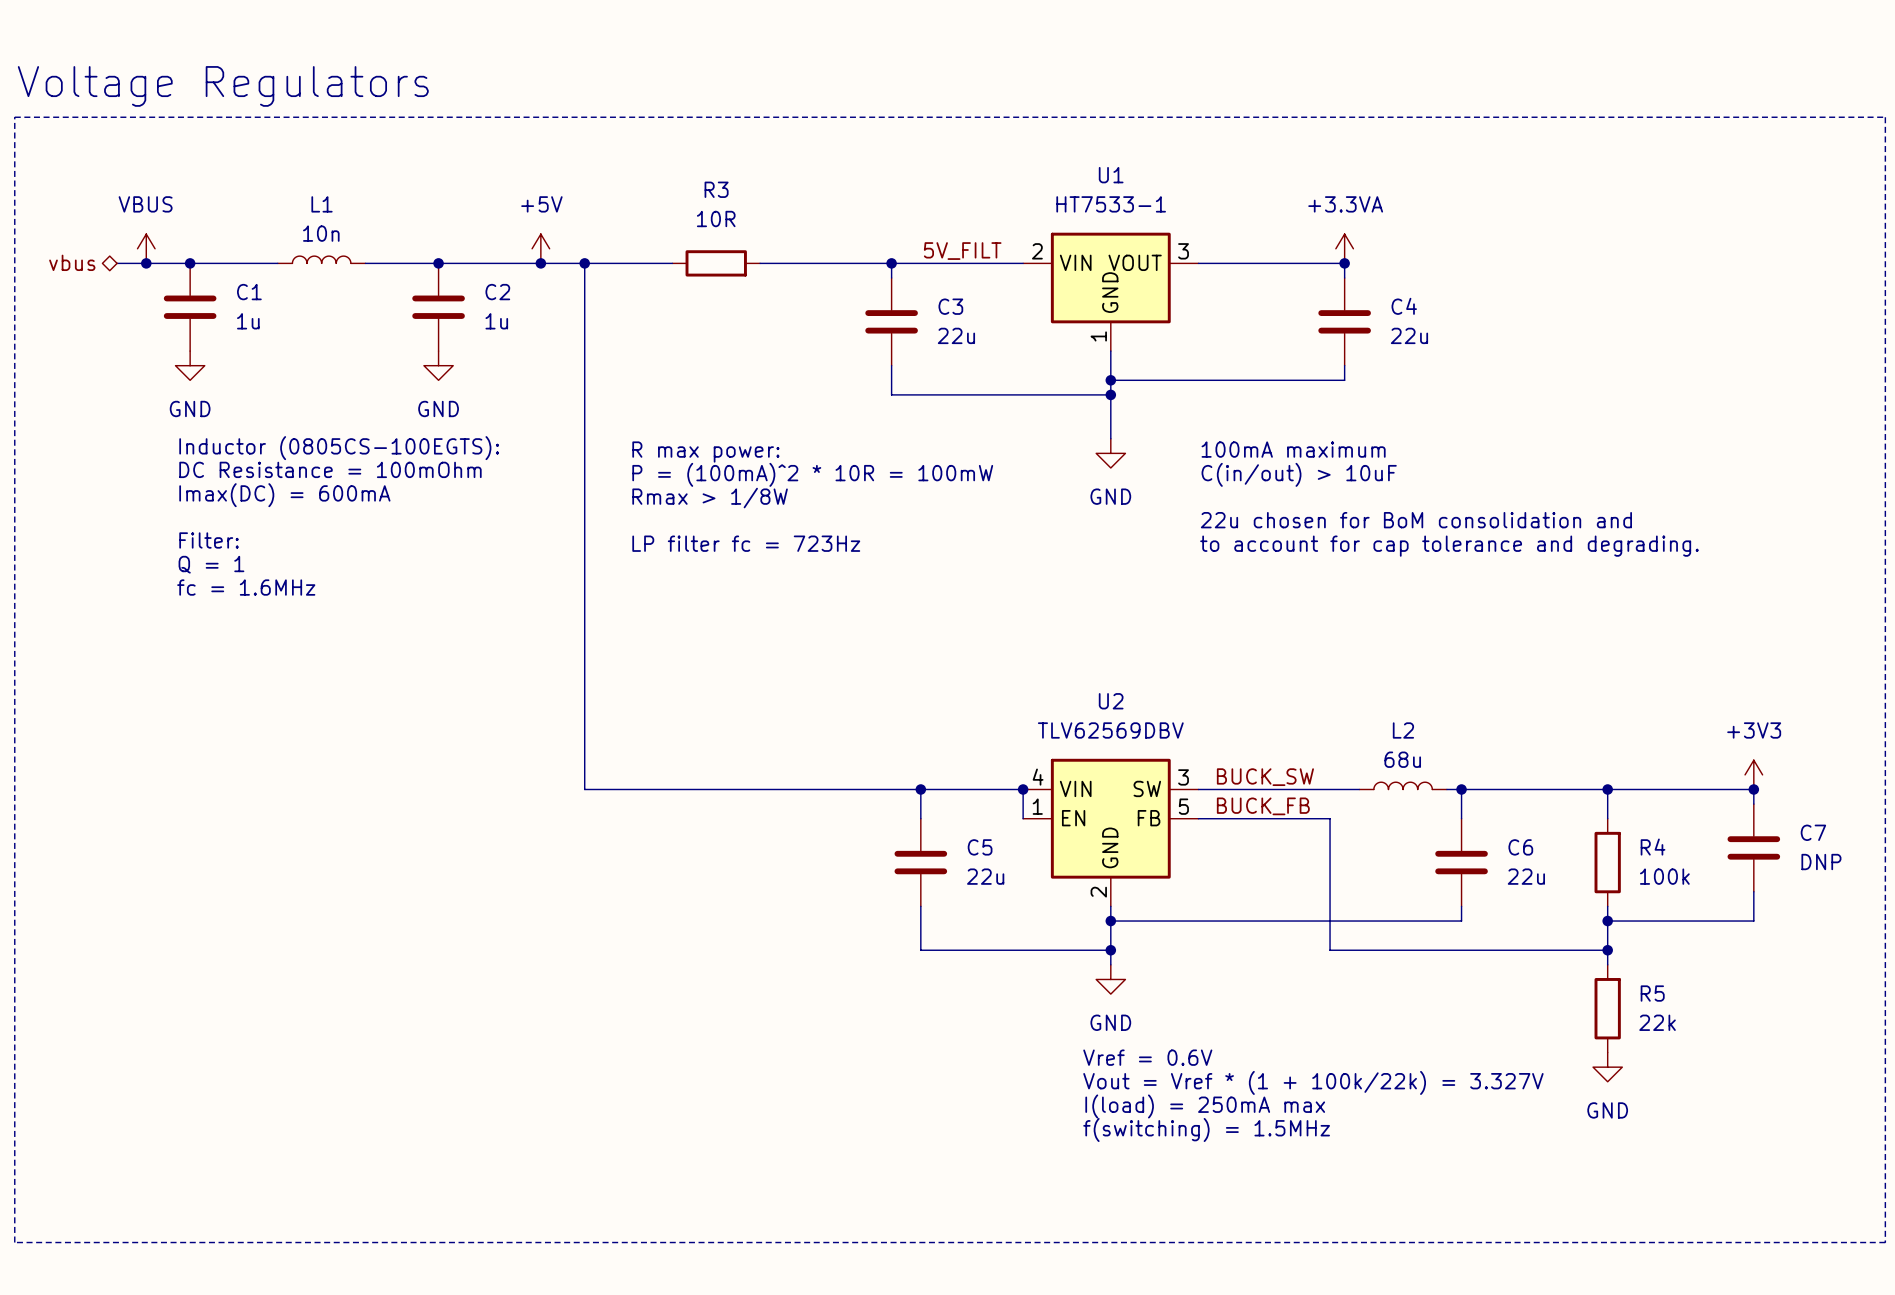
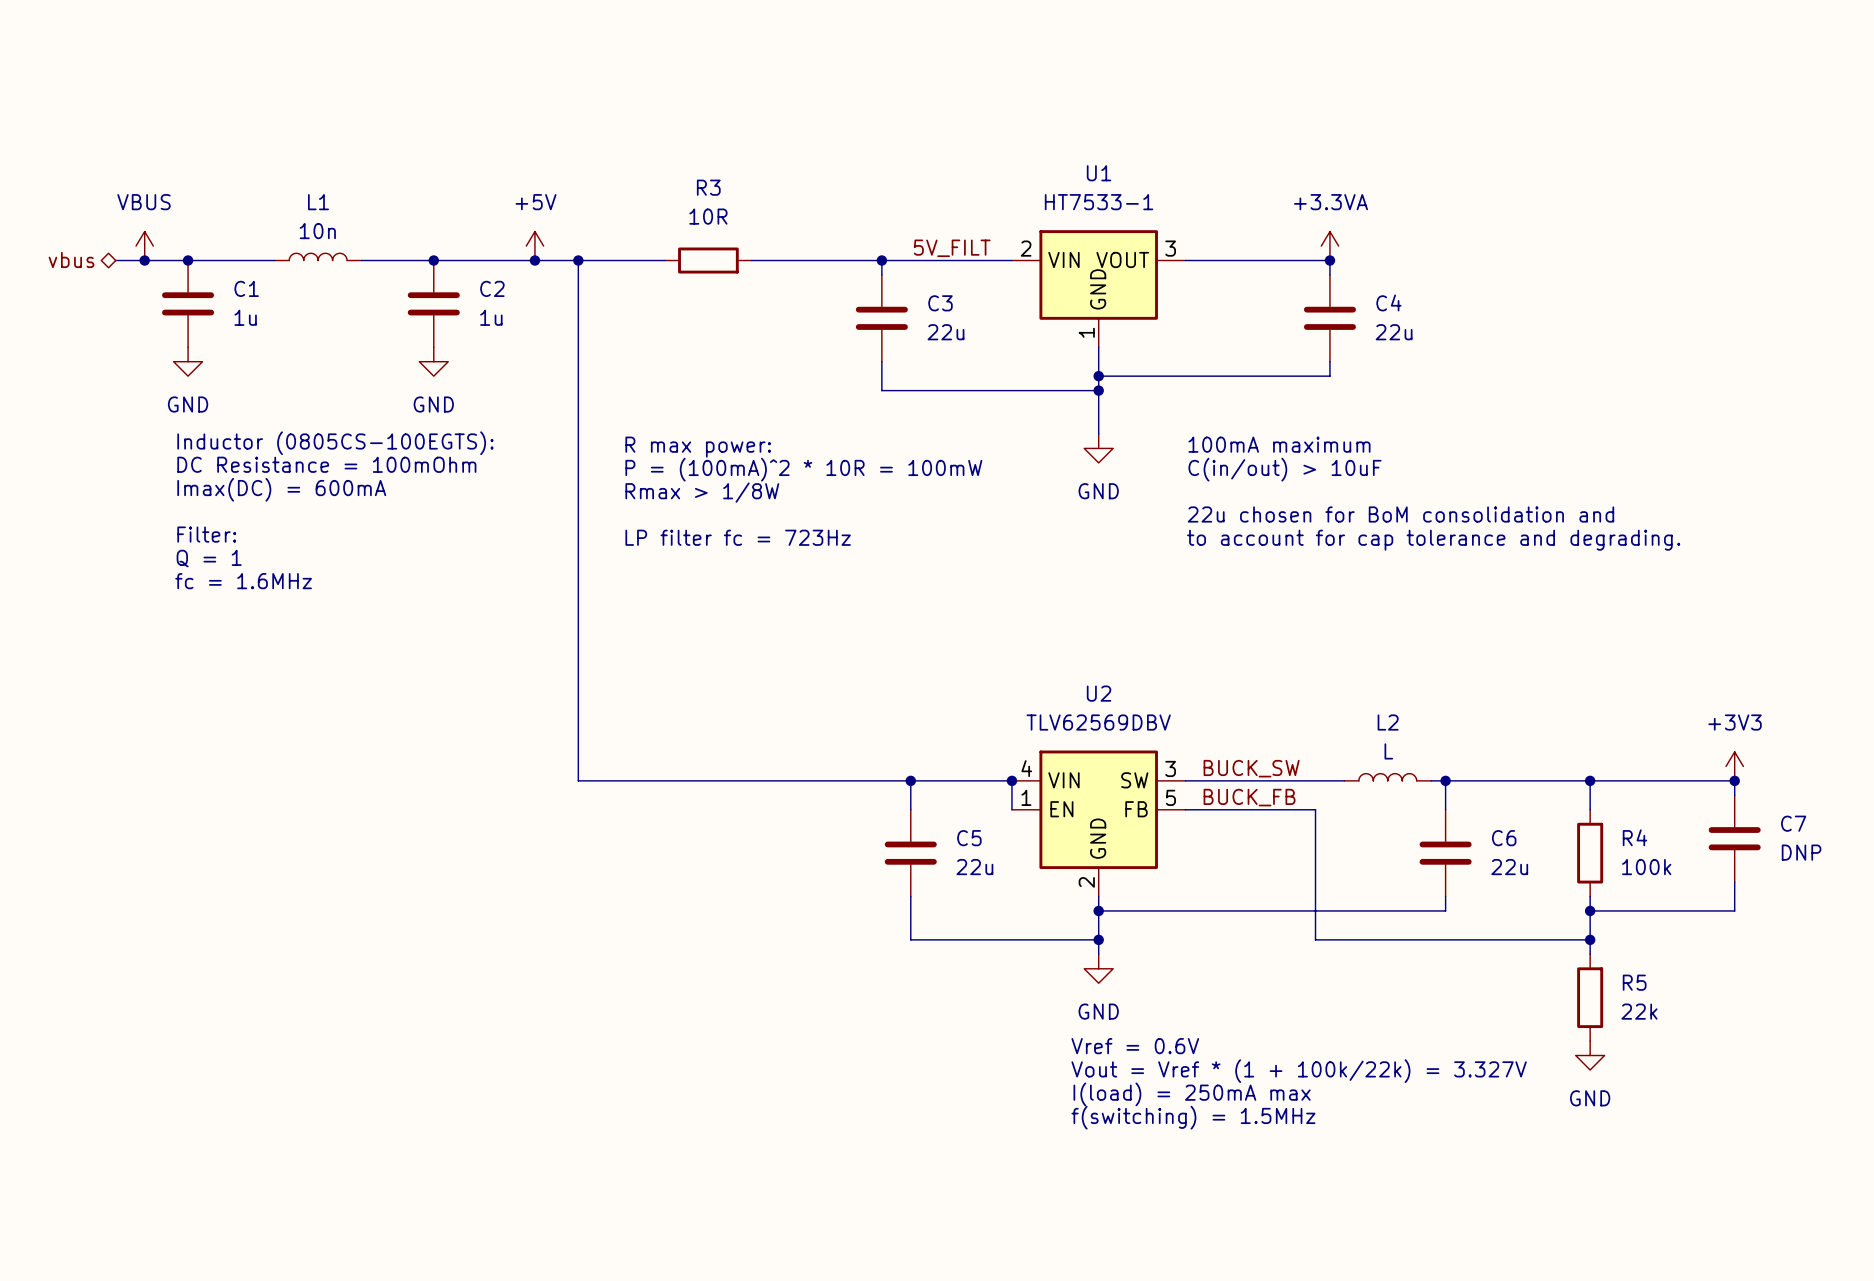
text: Voltage Regulators (223, 86) -> none
line: (14, 117) (1885, 117) (1885, 1242) (14, 1242) (14, 117) -> none
L2 value: 68u (1402, 759) -> L (1388, 751)

